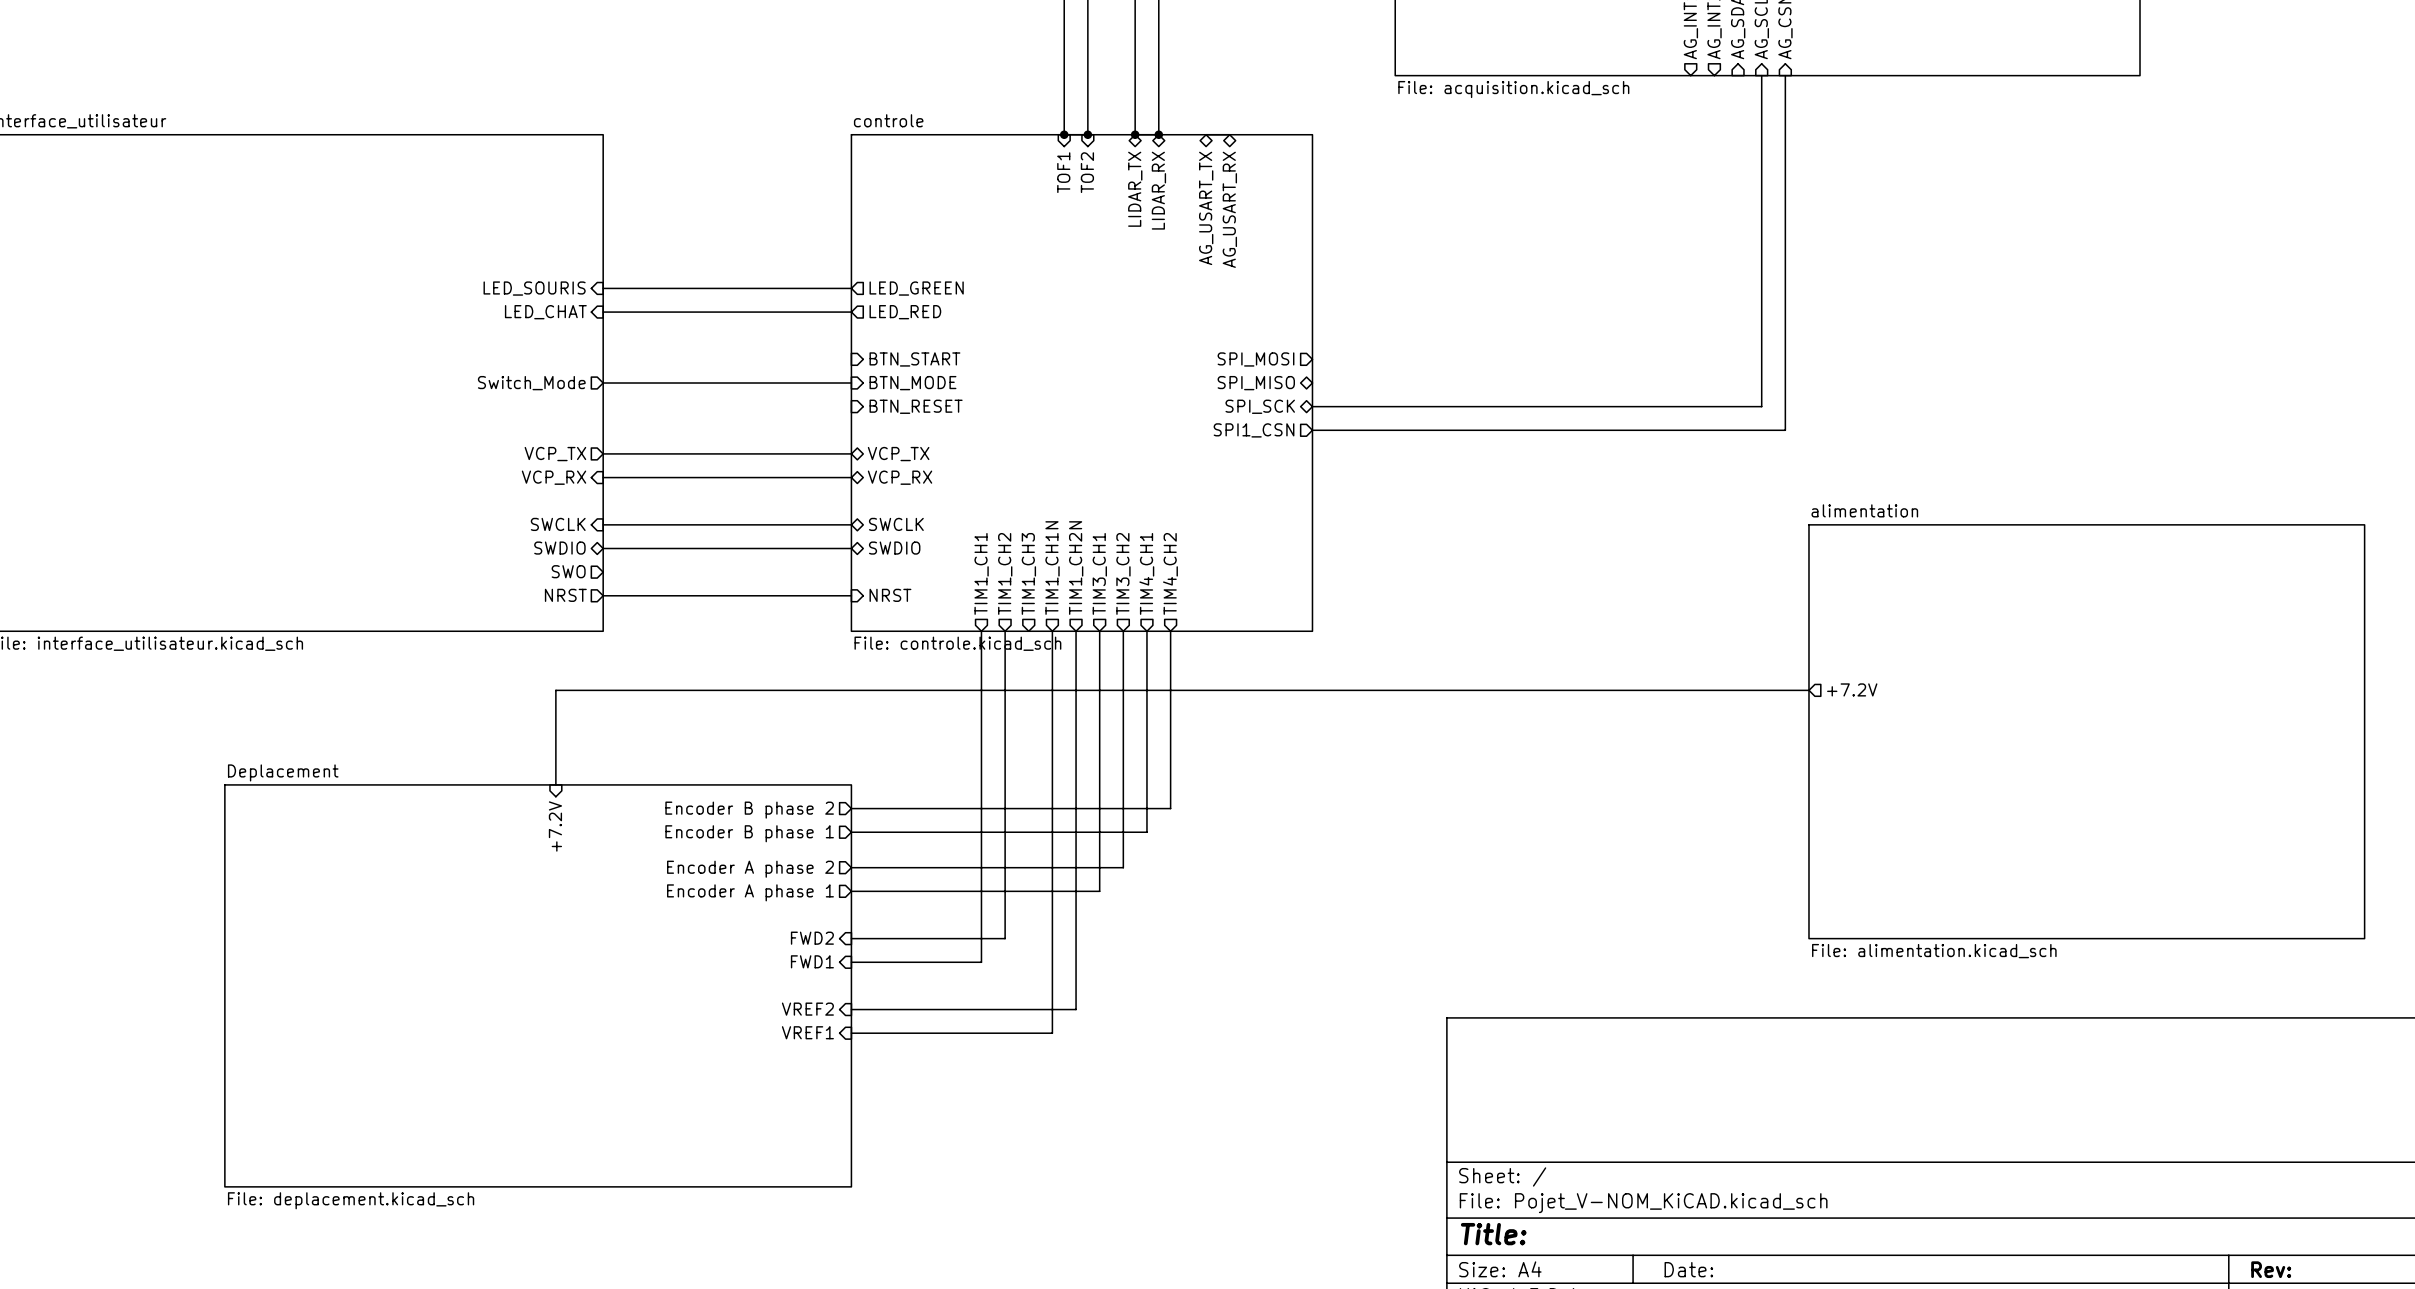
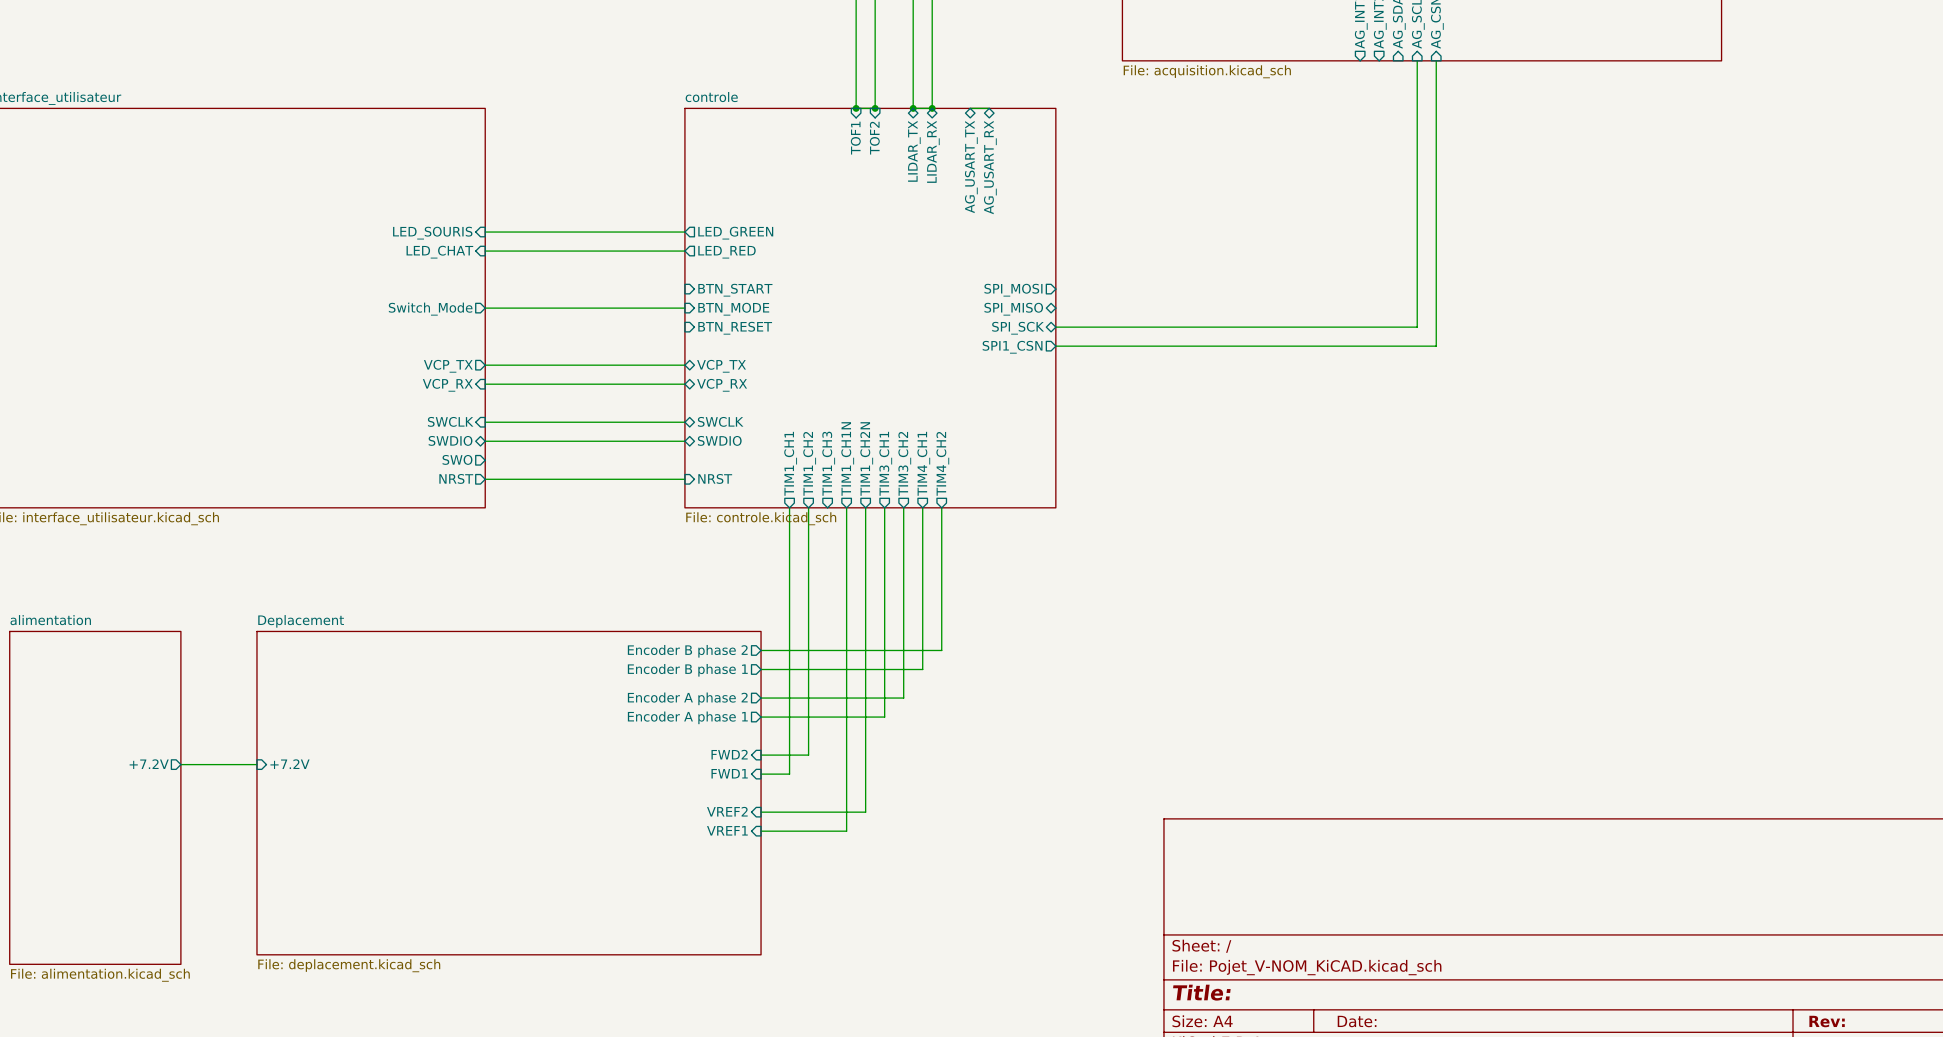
sheet pin: +7.2V (1852, 689) -> none
wire: (1808, 690) (555, 690) (555, 784) -> none
sheet alimentation: File: alimentation.kicad_sch (2086, 731) -> none
wire: (851, 808) (946, 808) -> none
sheet pin position: Encoder B phase 2 (749, 810) -> Encoder B phase 2 (687, 651)
sheet pin: +7.2V (555, 826) -> none
wire: (851, 832) (946, 832) -> none
sheet pin position: Encoder B phase 1 (749, 833) -> Encoder B phase 1 (687, 670)
wire: (851, 867) (946, 867) -> none
sheet pin position: Encoder A phase 2 (750, 869) -> Encoder A phase 2 (687, 698)
wire: (851, 891) (946, 891) -> none
sheet pin position: Encoder A phase 1 (750, 892) -> Encoder A phase 1 (687, 717)
sheet pin position: FWD2 (812, 938) -> FWD2 (729, 754)
wire: (851, 938) (946, 938) -> none
sheet pin: none -> +7.2V (149, 764)
wire: none -> (180, 764) (256, 764)
sheet pin: none -> +7.2V (290, 764)
sheet pin position: FWD1 (812, 961) -> FWD1 (729, 773)
wire: (851, 962) (946, 962) -> none
sheet Deplacement position: (538, 985) -> (509, 793)
sheet alimentation: none -> File: alimentation.kicad_sch (95, 797)
sheet pin position: VREF2 (807, 1009) -> VREF2 (727, 811)
wire: (851, 1009) (946, 1009) -> none
sheet pin position: VREF1 (807, 1032) -> VREF1 (727, 830)
wire: (851, 1033) (946, 1033) -> none

